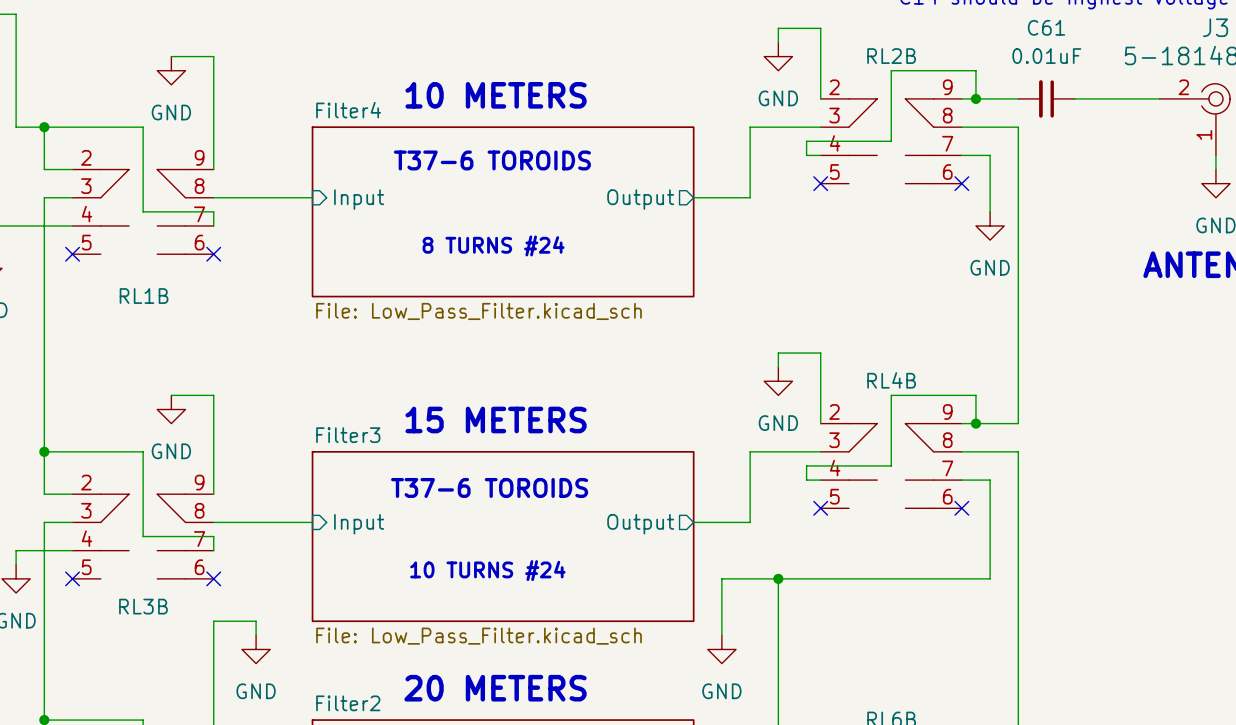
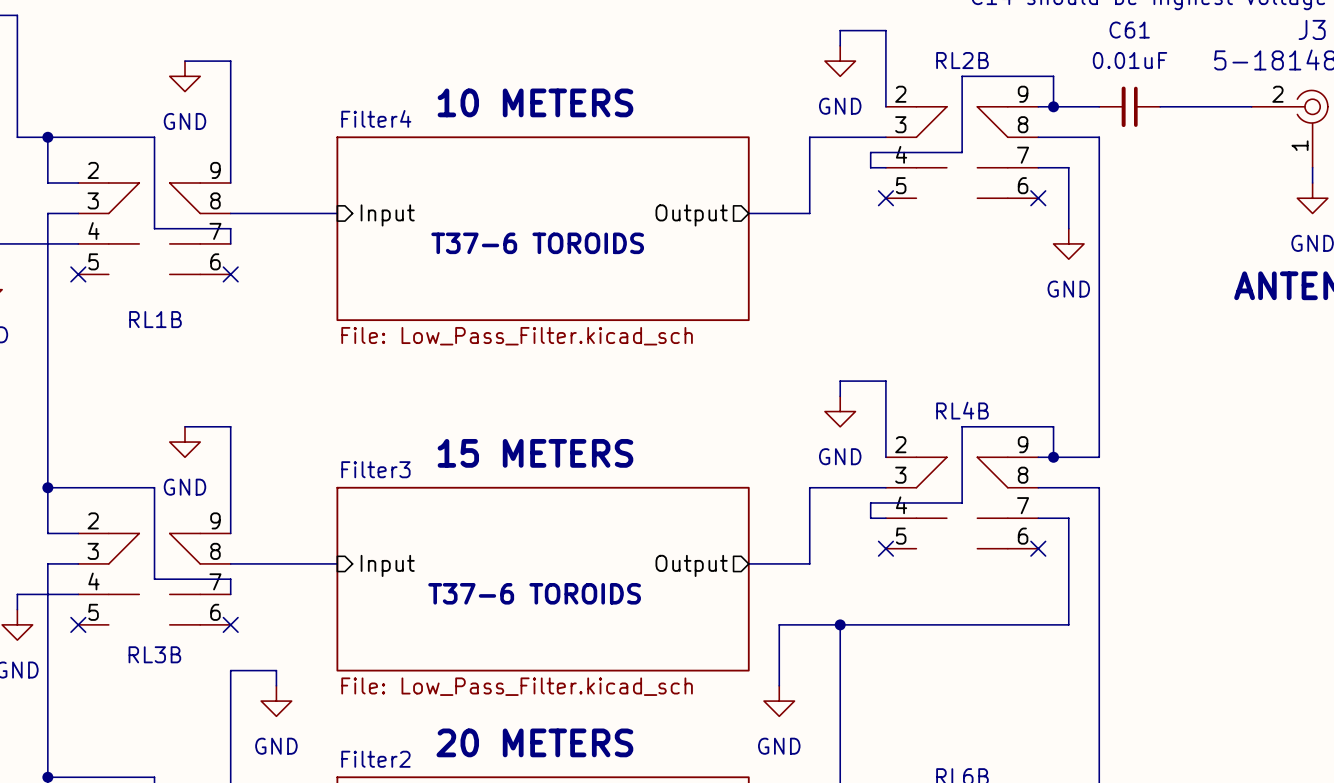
text position: T37-6 TOROIDS (492, 160) -> T37-6 TOROIDS (537, 243)
text: 8 TURNS #24 (493, 245) -> none
text position: T37-6 TOROIDS (489, 487) -> T37-6 TOROIDS (534, 593)
text: 10 TURNS #24 (487, 570) -> none

